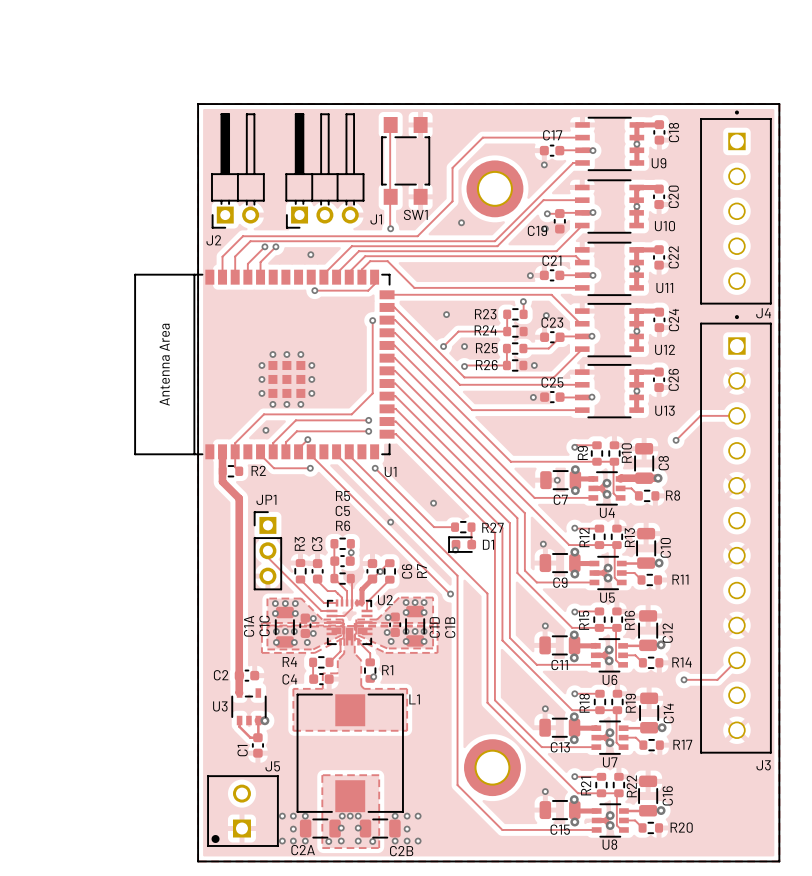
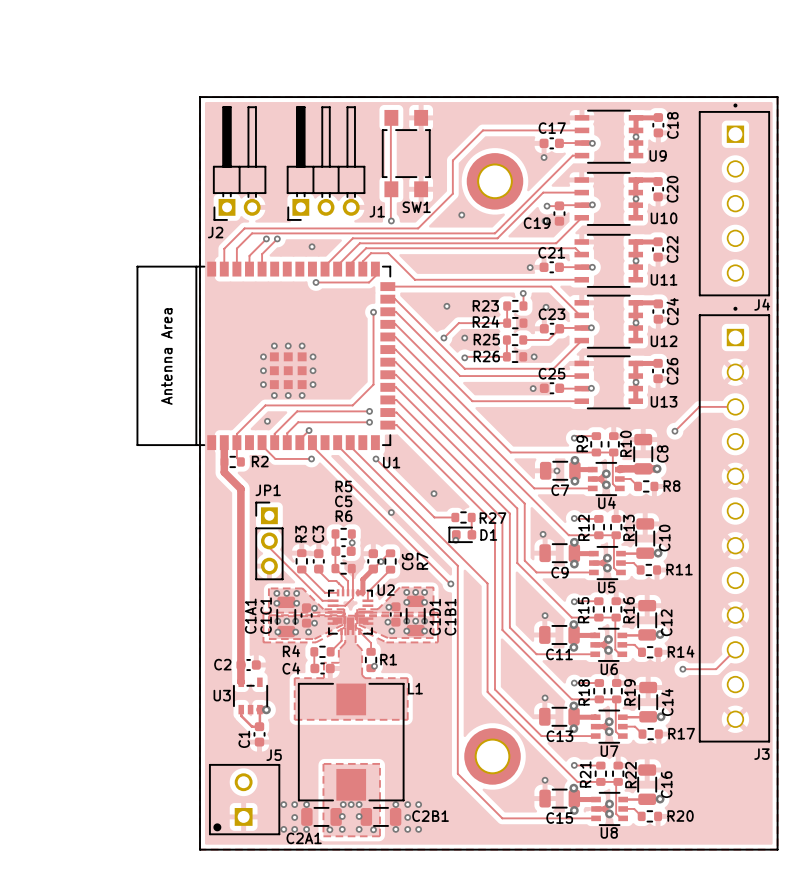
C1C name: C1C (264, 625) -> C1C1 (266, 615)
C1A name: C1A (249, 626) -> C1A1 (250, 616)
C1D name: C1D (434, 627) -> C1D1 (435, 617)
C1B name: C1B (450, 627) -> C1B1 (450, 617)
C2A name: C2A (303, 850) -> C2A1 (304, 838)
C2B name: C2B (401, 851) -> C2B1 (430, 816)

